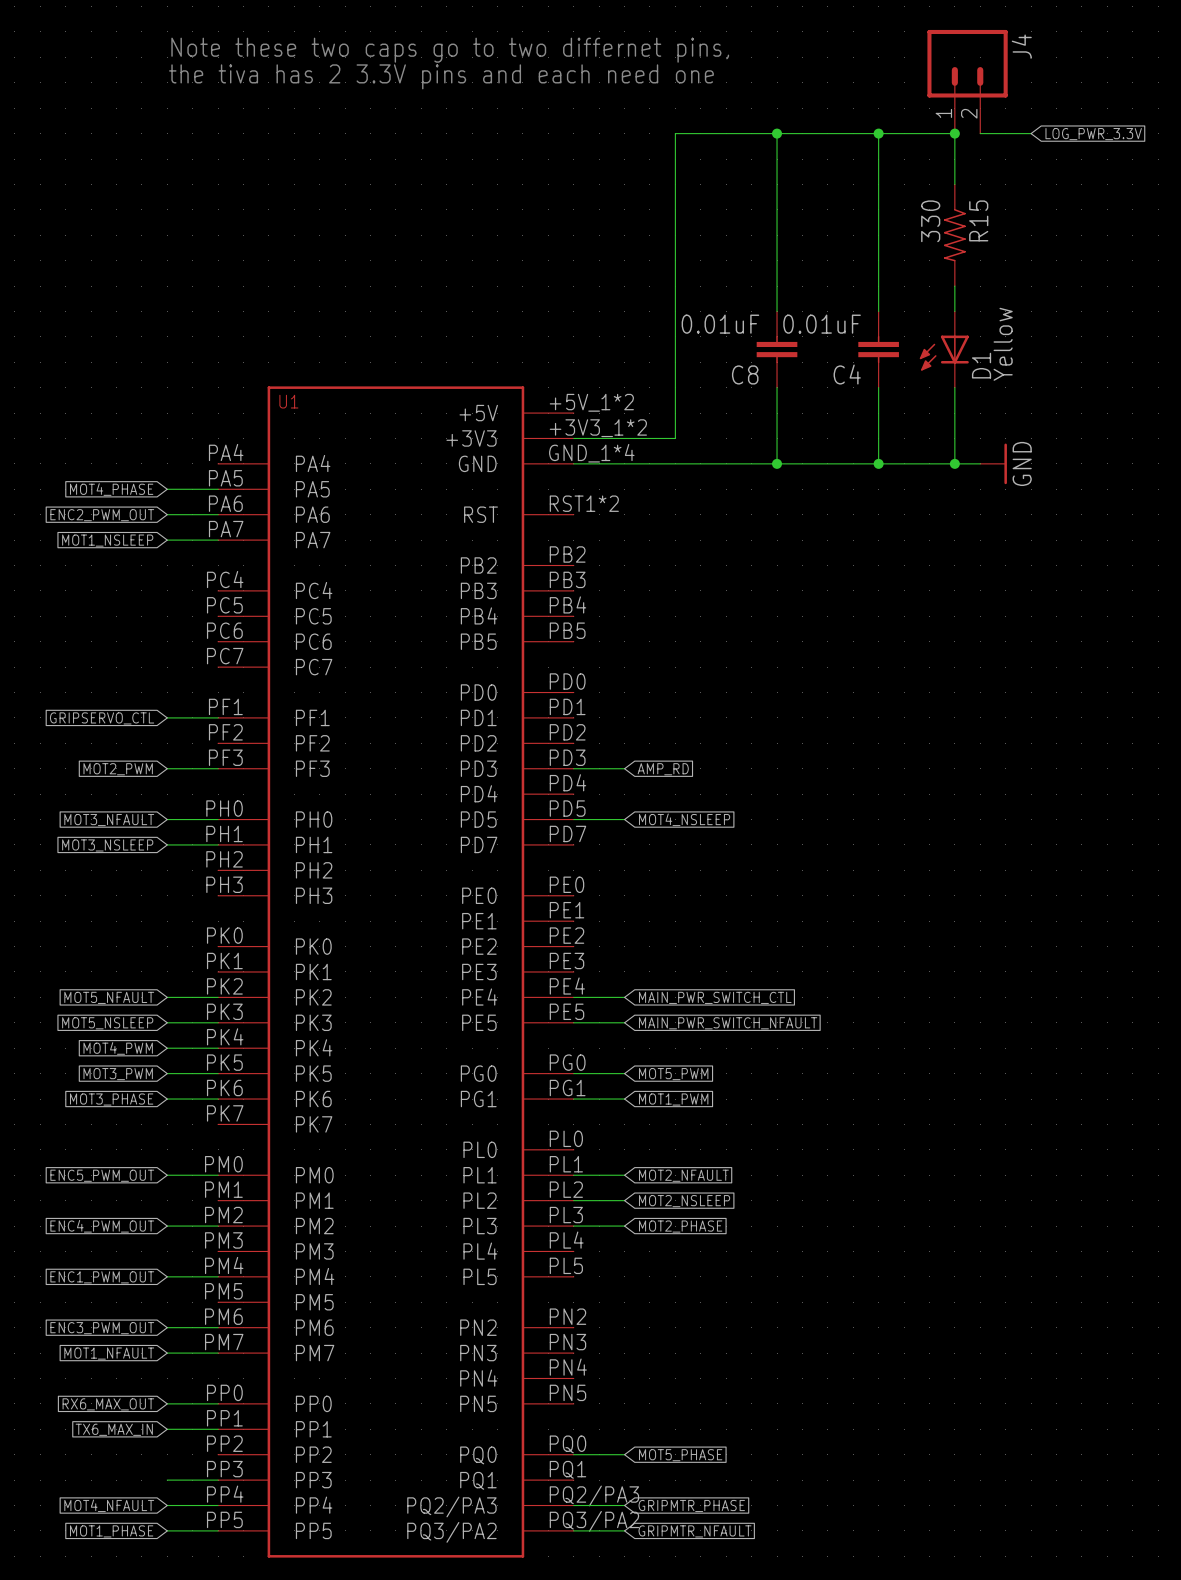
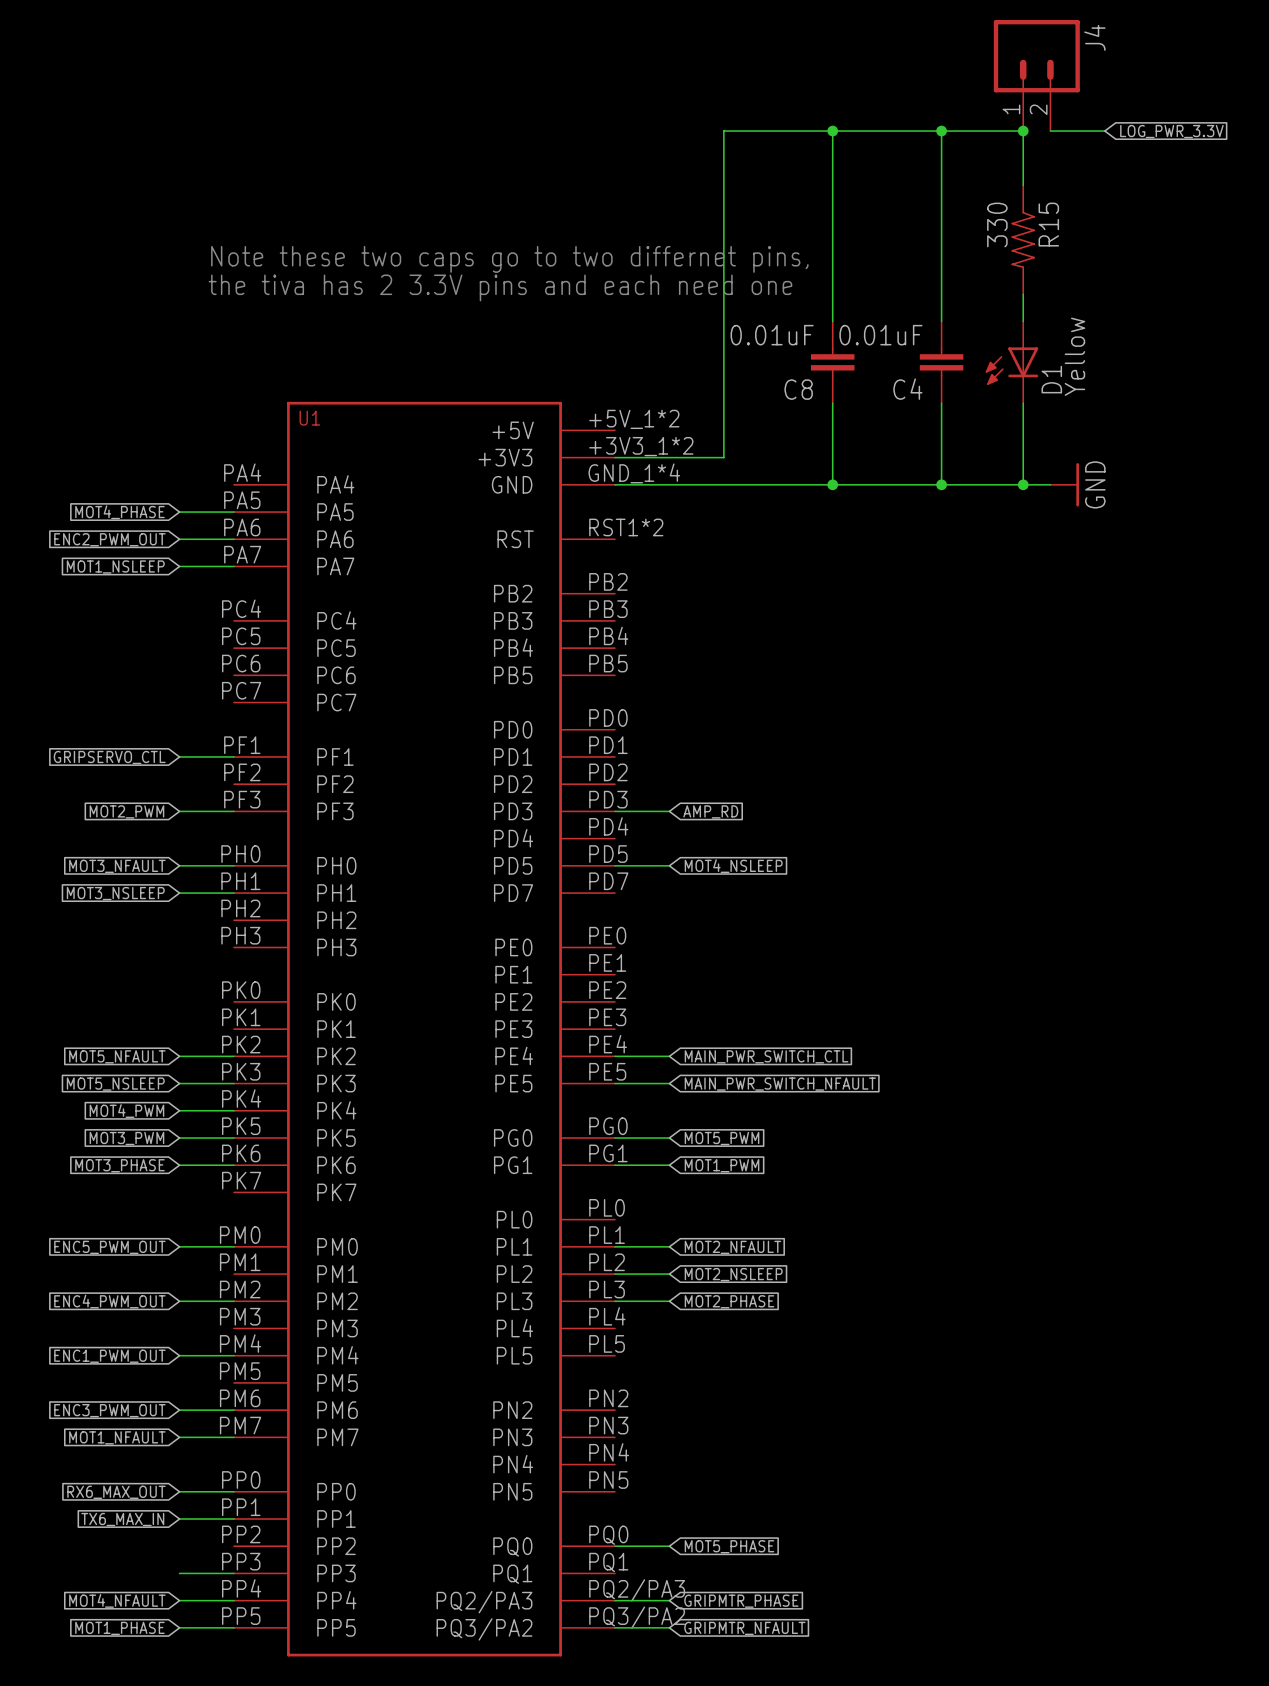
text position: Note these two caps go to two differnet pins, (450, 50) -> Note these two caps go to two differnet pins, (509, 259)
text position: the tiva has 2 3.3V pins and each need one (441, 76) -> the tiva has 2 3.3V pins and each need one (500, 287)

